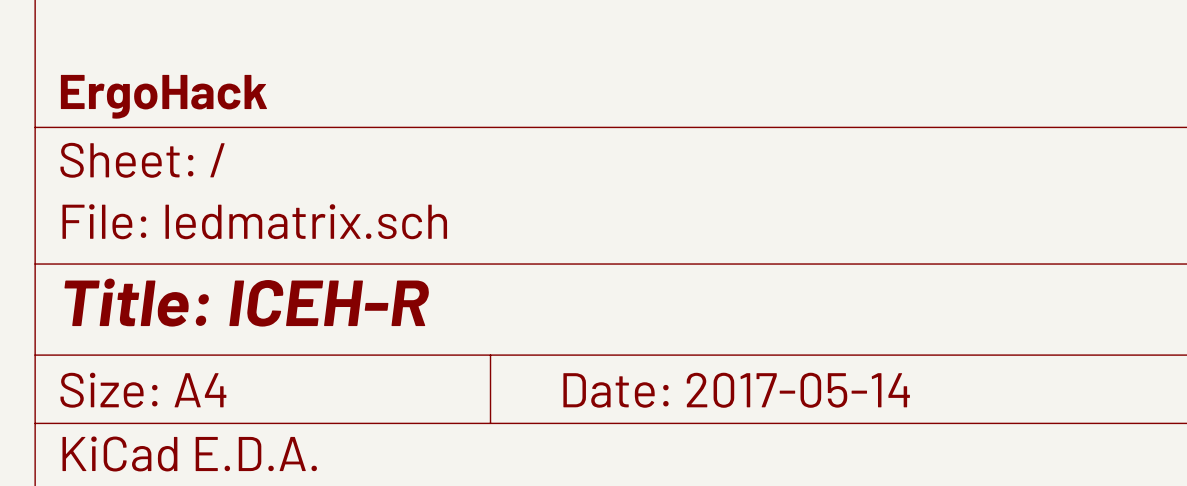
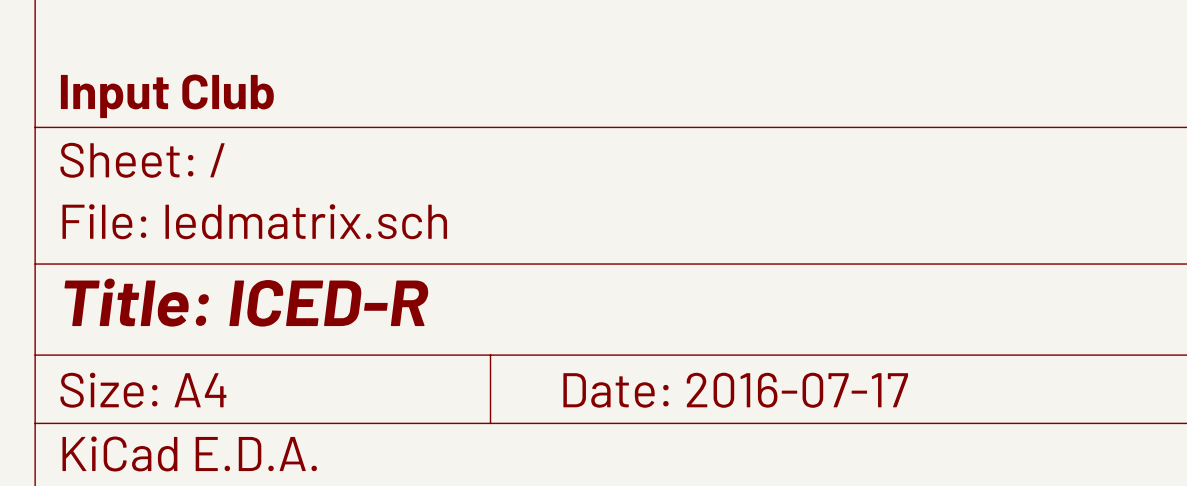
title block: ErgoHack (163, 96) -> Input Club (167, 96)
title block: Title: ICEH-R (246, 302) -> Title: ICED-R (246, 302)
title block: Date: 2017-05-14 (736, 390) -> Date: 2016-07-17 (735, 390)

